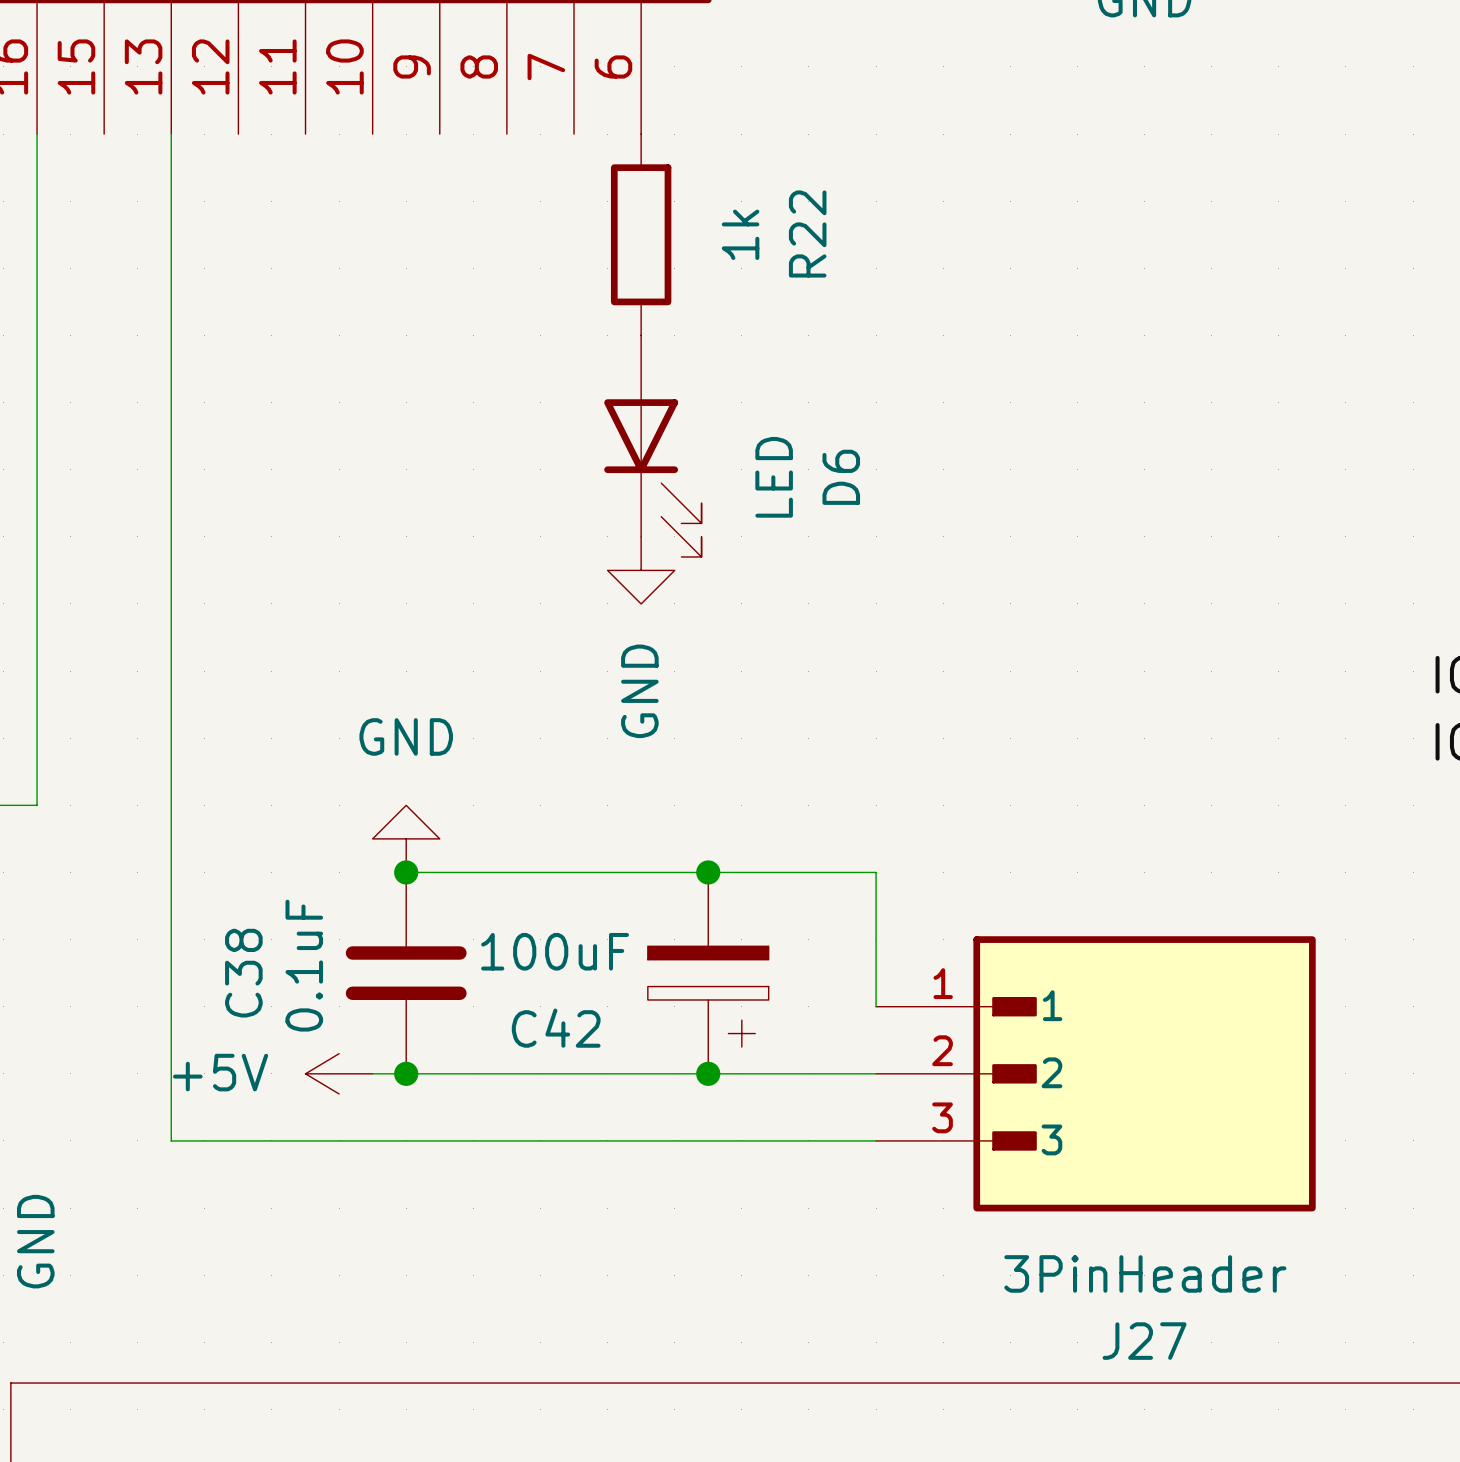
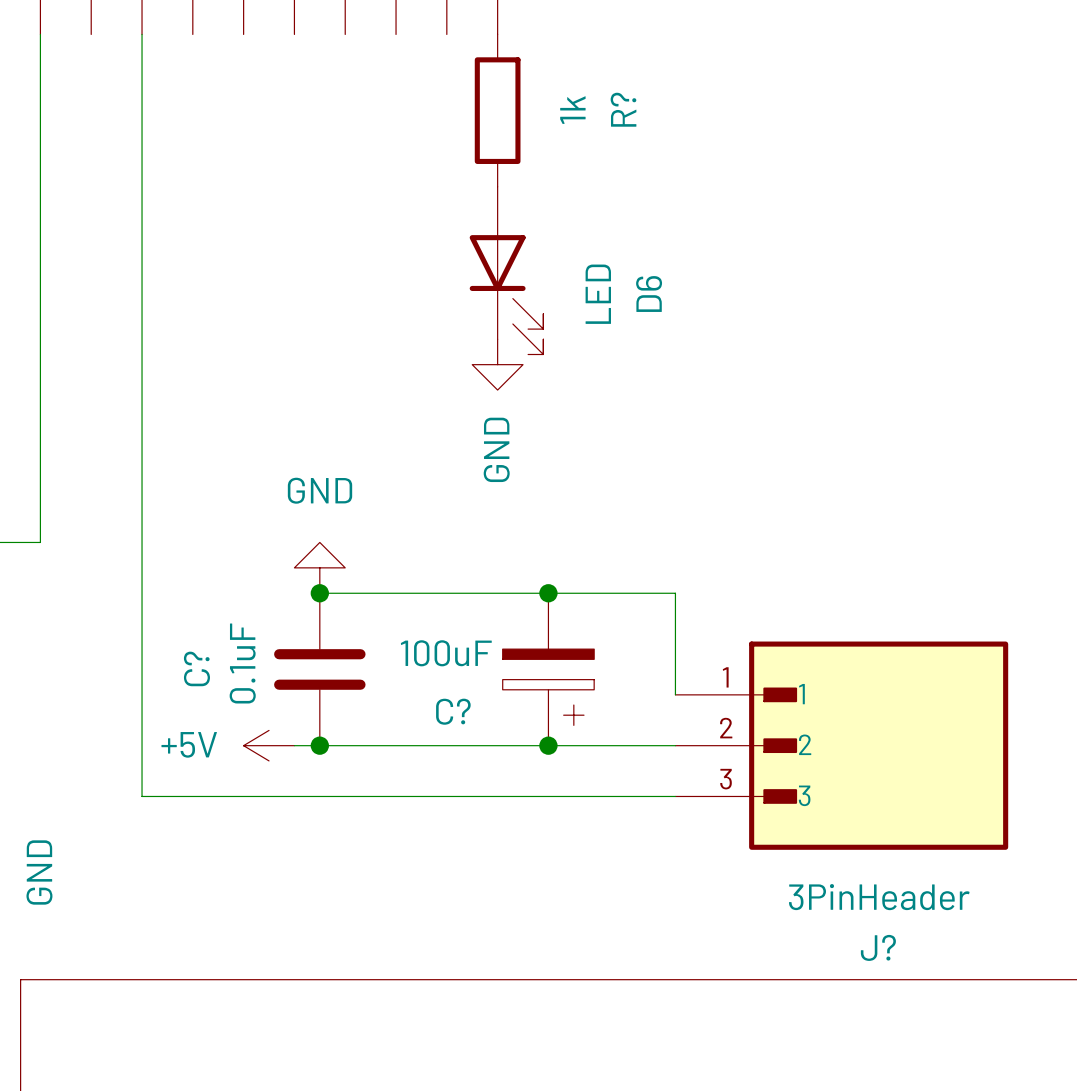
R22 name: R22 (807, 233) -> R? (623, 109)
C38 name: C38 (243, 973) -> C? (196, 668)
C42 name: C42 (556, 1028) -> C? (453, 711)
J27 name: J27 (1144, 1341) -> J? (878, 947)

